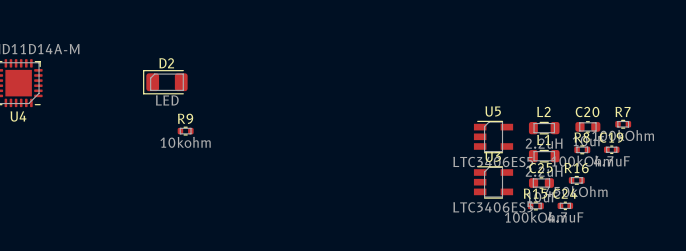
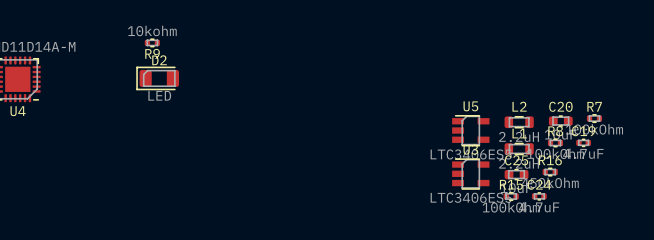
R9 name position: R9 (185, 118) -> R9 (152, 53)
R9 position: (185, 131) -> (152, 42)
R9 value position: 10kohm (185, 142) -> 10kohm (152, 30)

